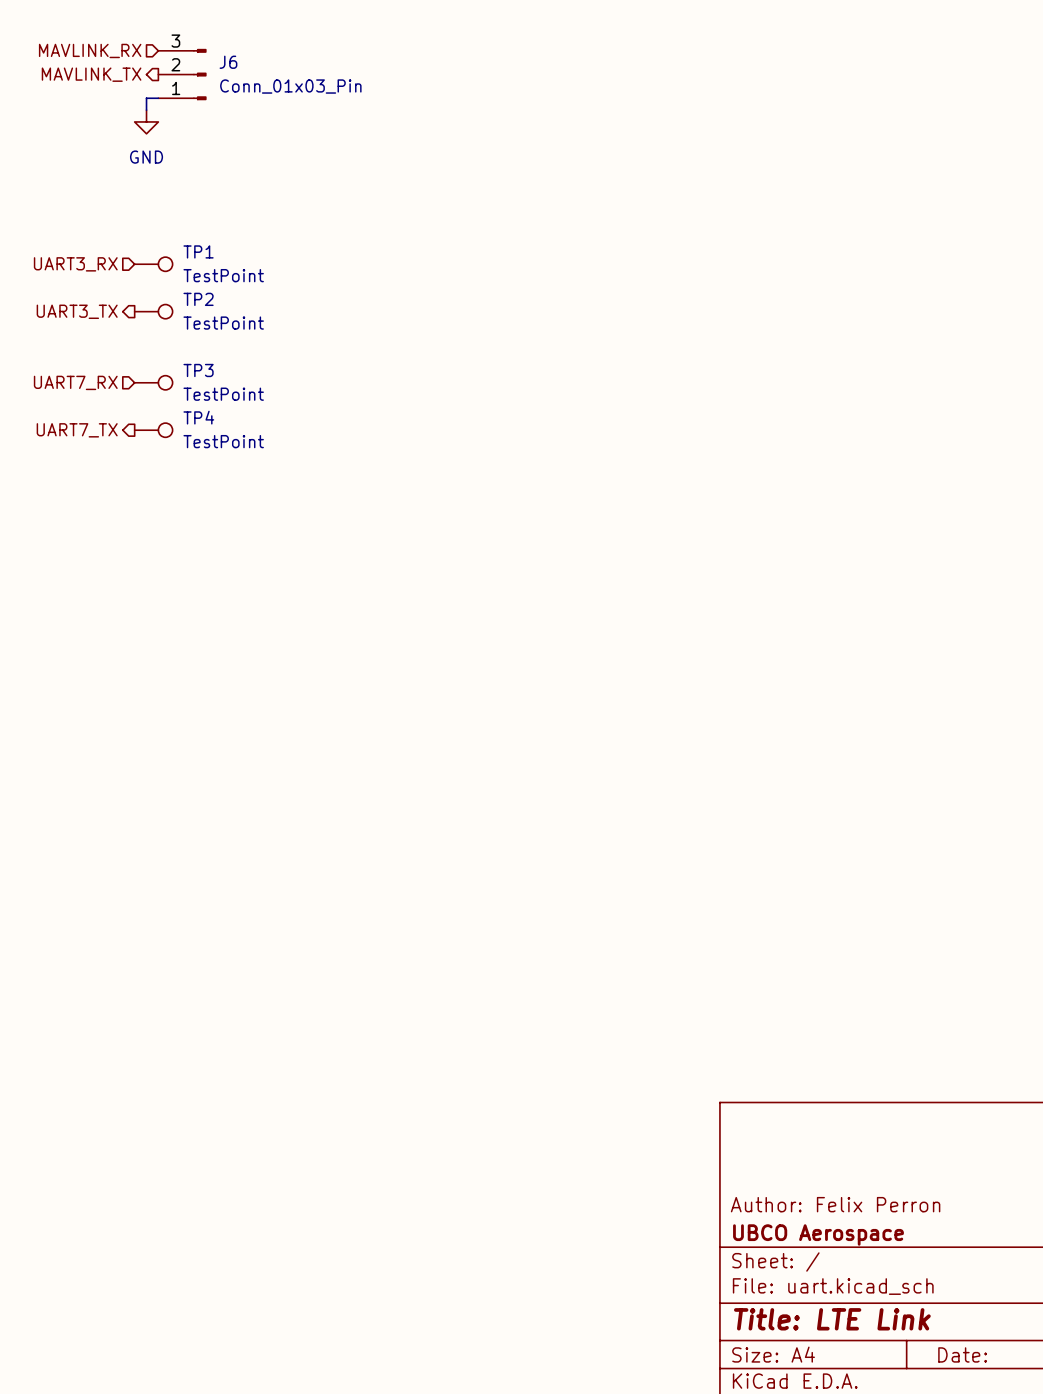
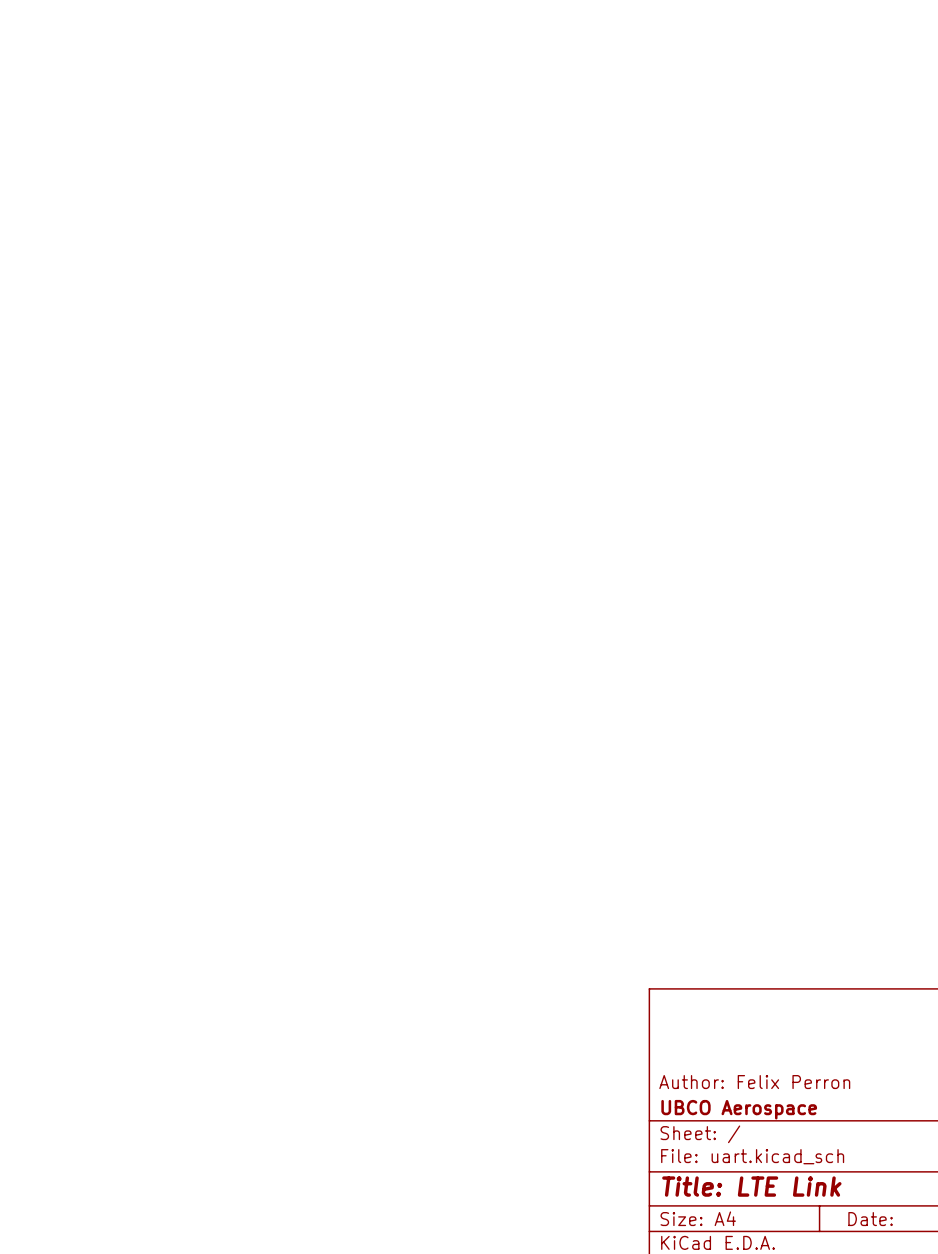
hierarchical label: MAVLINK_RX (90, 50) -> none
hierarchical label: MAVLINK_TX (91, 74) -> none
J6: Conn_01x03_Pin (182, 74) -> none
wire: (158, 98) (146, 98) (146, 110) -> none
power symbol: GND (146, 121) -> none
hierarchical label: UART3_RX (75, 264) -> none
TP1: TestPoint (153, 264) -> none
hierarchical label: UART3_TX (77, 311) -> none
TP2: TestPoint (153, 311) -> none
hierarchical label: UART7_RX (75, 382) -> none
TP3: TestPoint (153, 382) -> none
hierarchical label: UART7_TX (77, 430) -> none
TP4: TestPoint (153, 430) -> none

